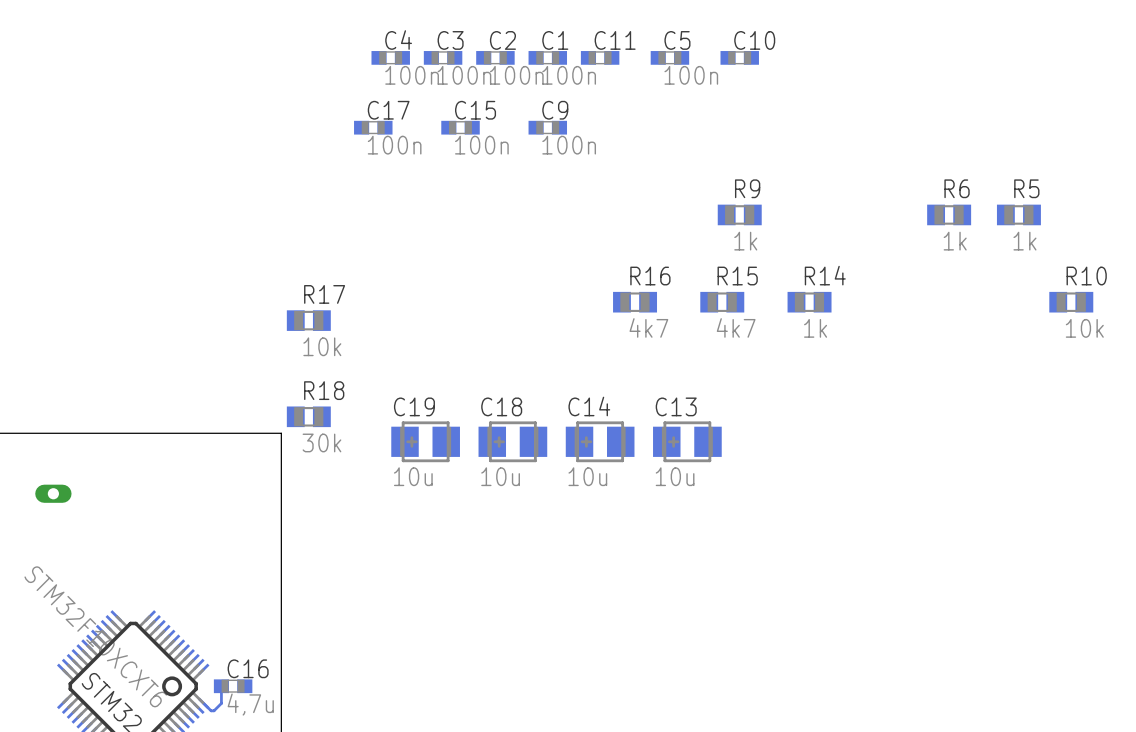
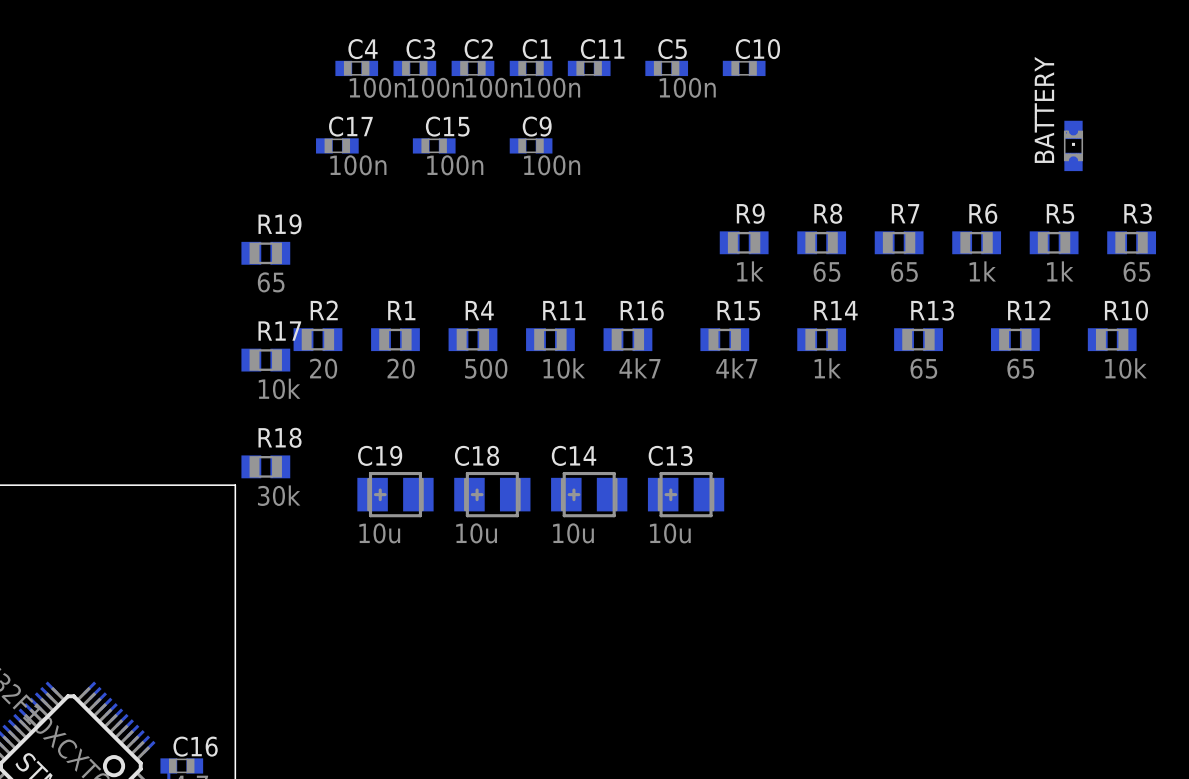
BATTERY: none -> (1073, 145)
R8: none -> 65 (821, 242)
R7: none -> 65 (899, 242)
R3: none -> 65 (1131, 242)
R19: none -> 65 (265, 253)
R2: none -> 20 (317, 339)
R1: none -> 20 (395, 339)
R4: none -> 500 (472, 339)
R11: none -> 10k (550, 339)
R13: none -> 65 (918, 339)
R12: none -> 65 (1015, 339)

